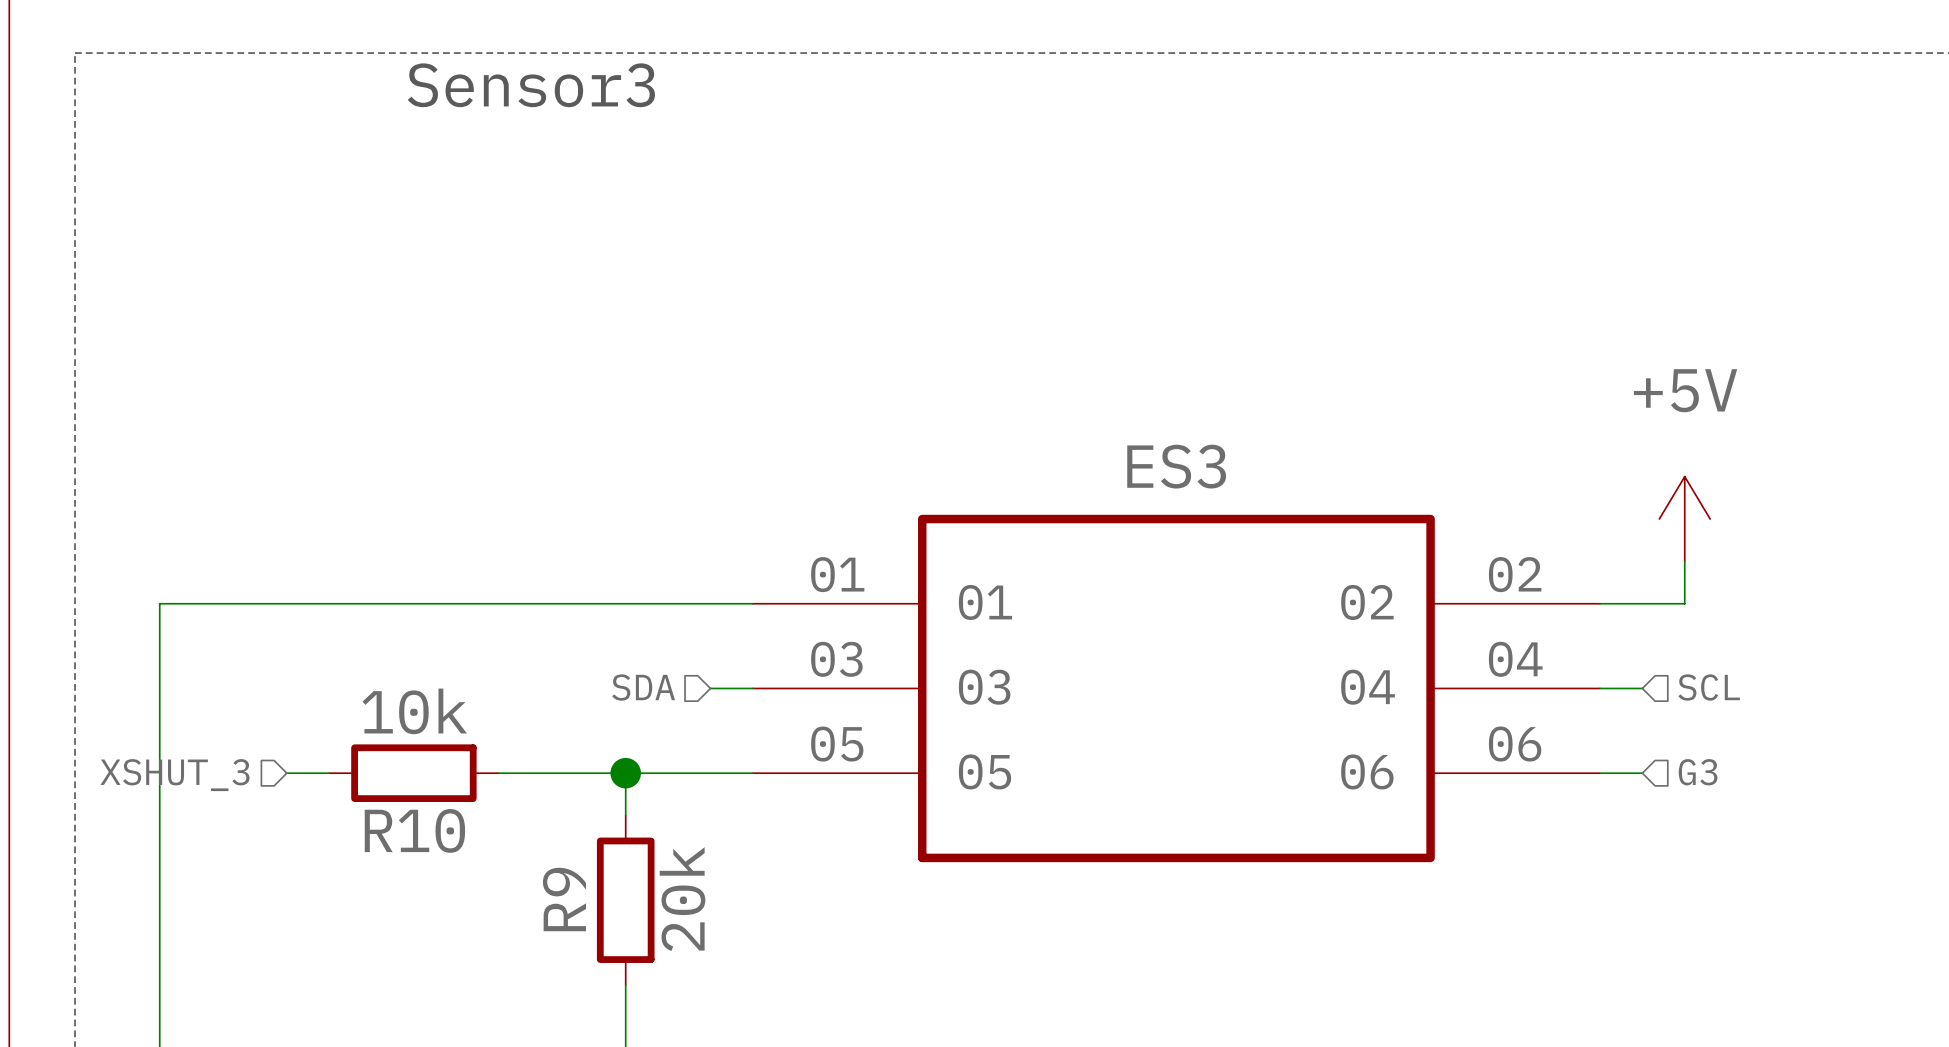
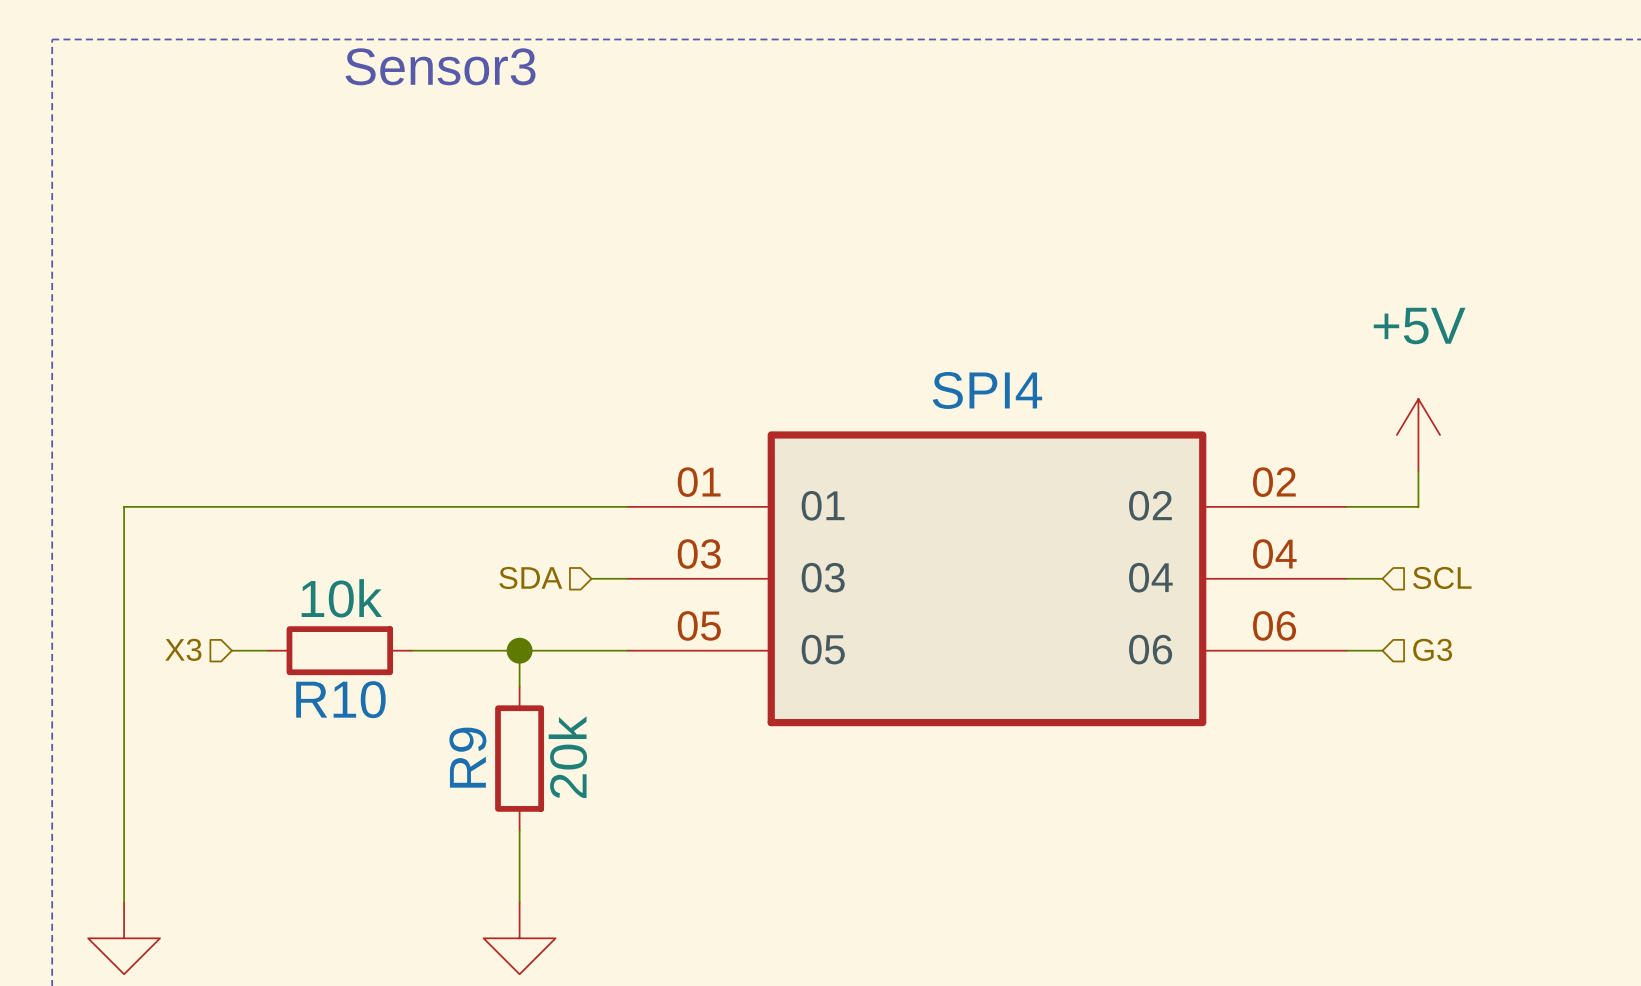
ES3 name: ES3 (1176, 466) -> SPI4 (987, 390)
hierarchical label: XSHUT_3 (175, 775) -> X3 (183, 649)

